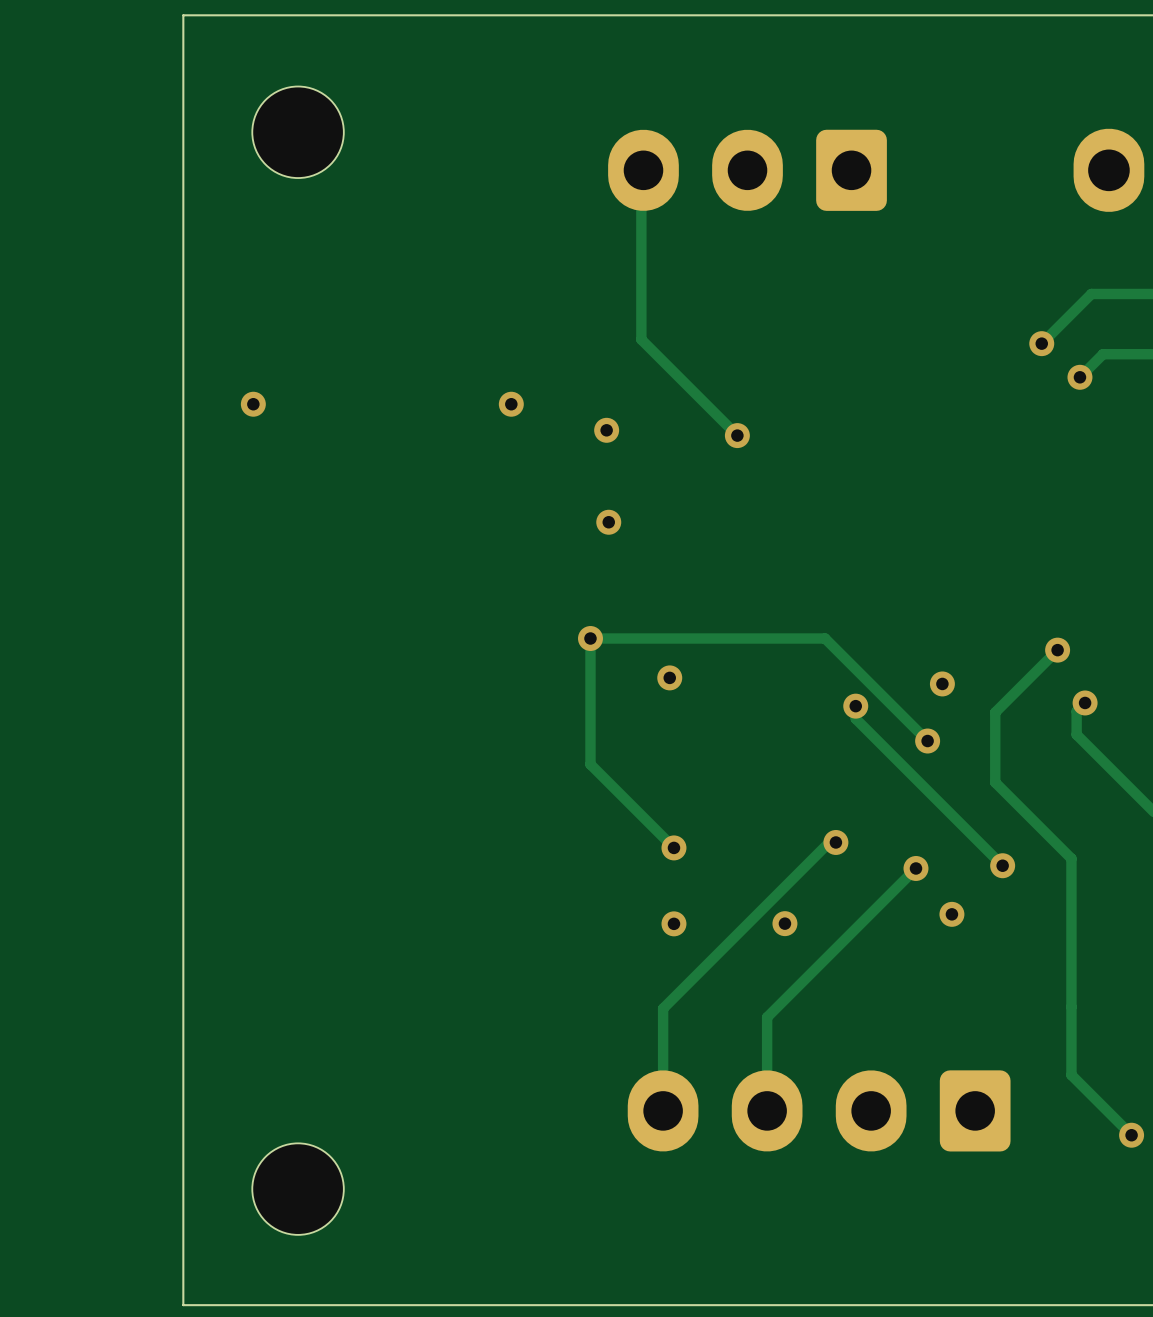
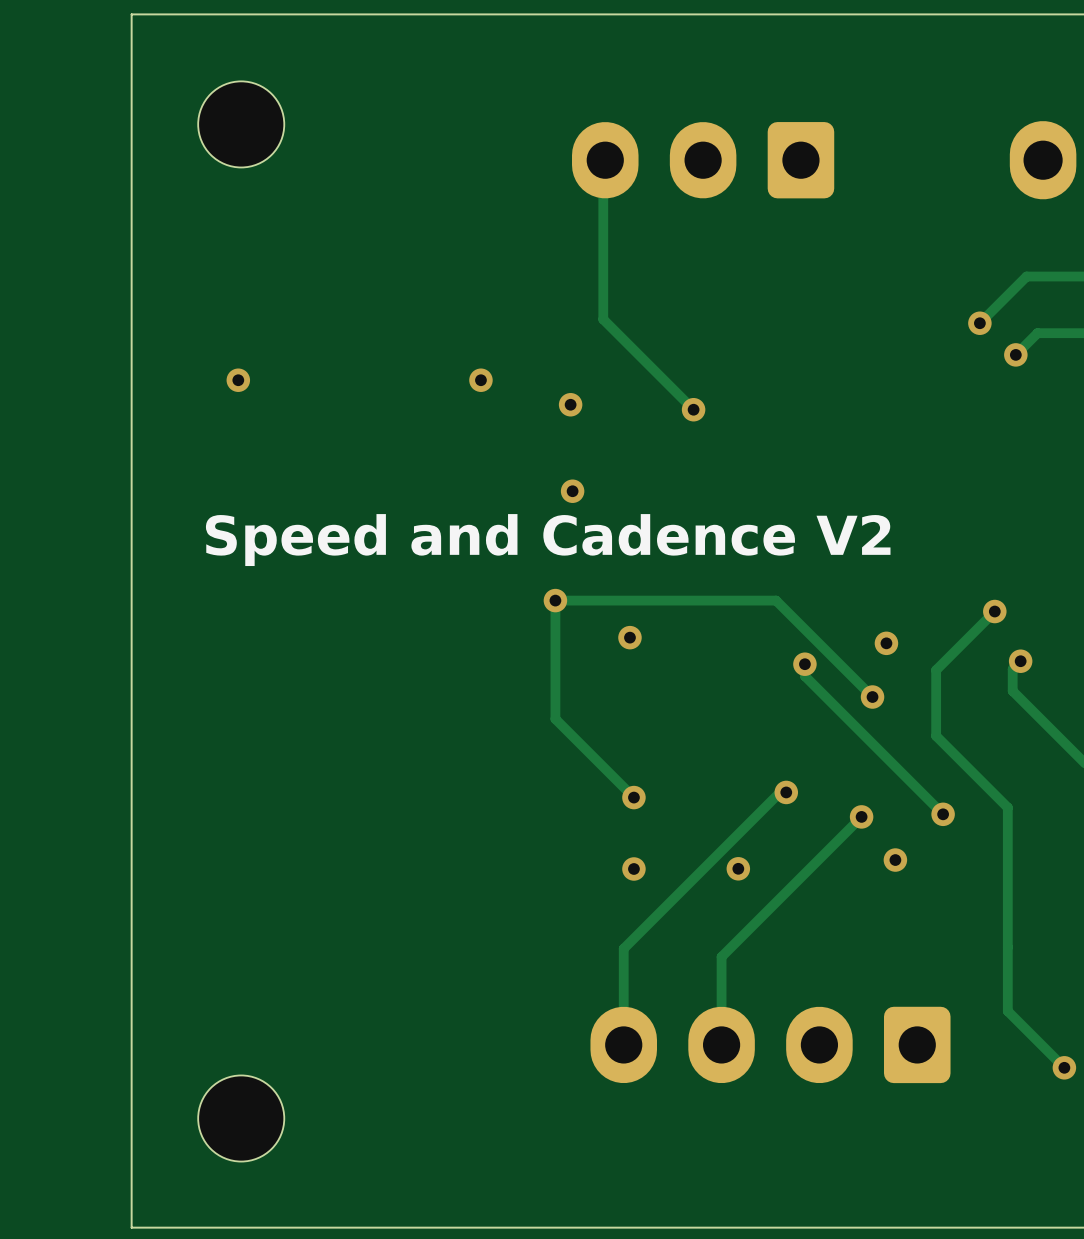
board edge: (183, 15) (183, 1305) -> (172, 14) (131, 14) (131, 1227) (172, 1227)
part position: (298, 132) -> (241, 124)
text: none -> Speed and Cadence V2 (548, 540)
part position: (298, 1189) -> (241, 1118)

